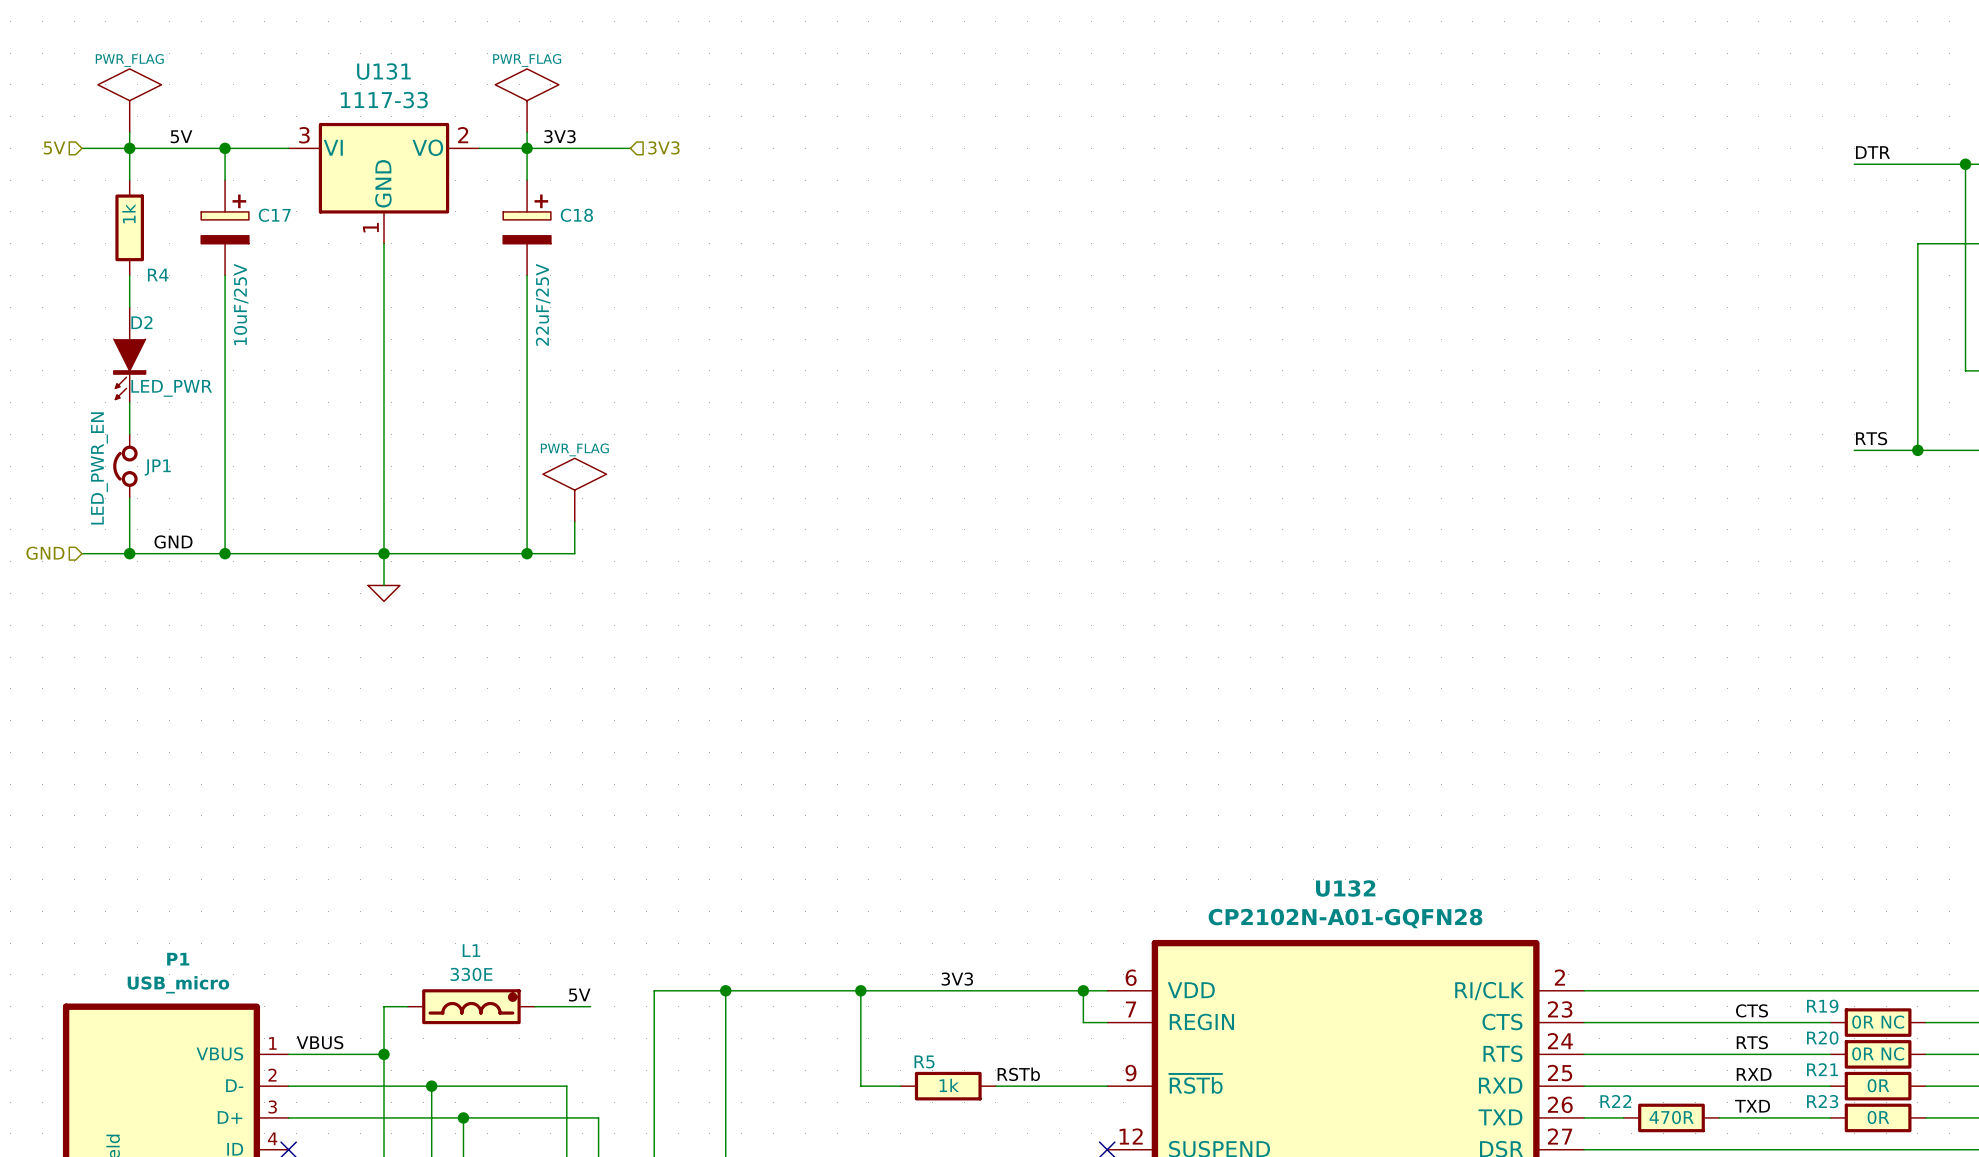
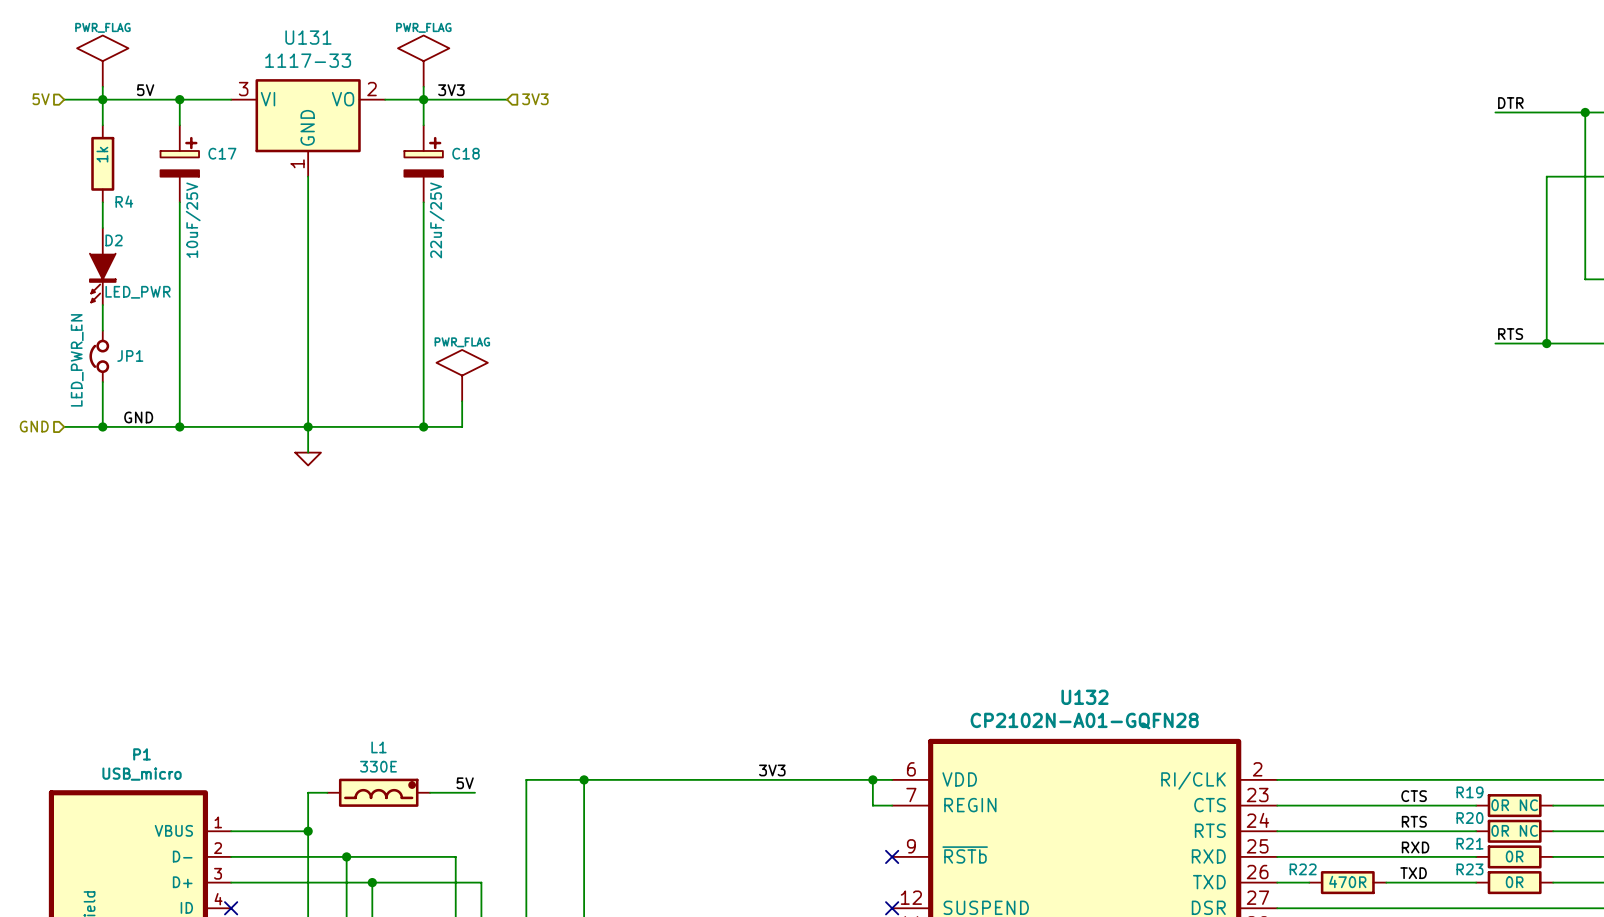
wire: (860, 990) (860, 1086) (900, 1086) -> none
junction: (860, 990) -> none
label: VBUS (320, 1042) -> none
label: RSTb (1018, 1074) -> none
R5: 1k (948, 1086) -> none
wire: (995, 1086) (1107, 1086) -> none
no-connect mark: none -> (892, 856)

